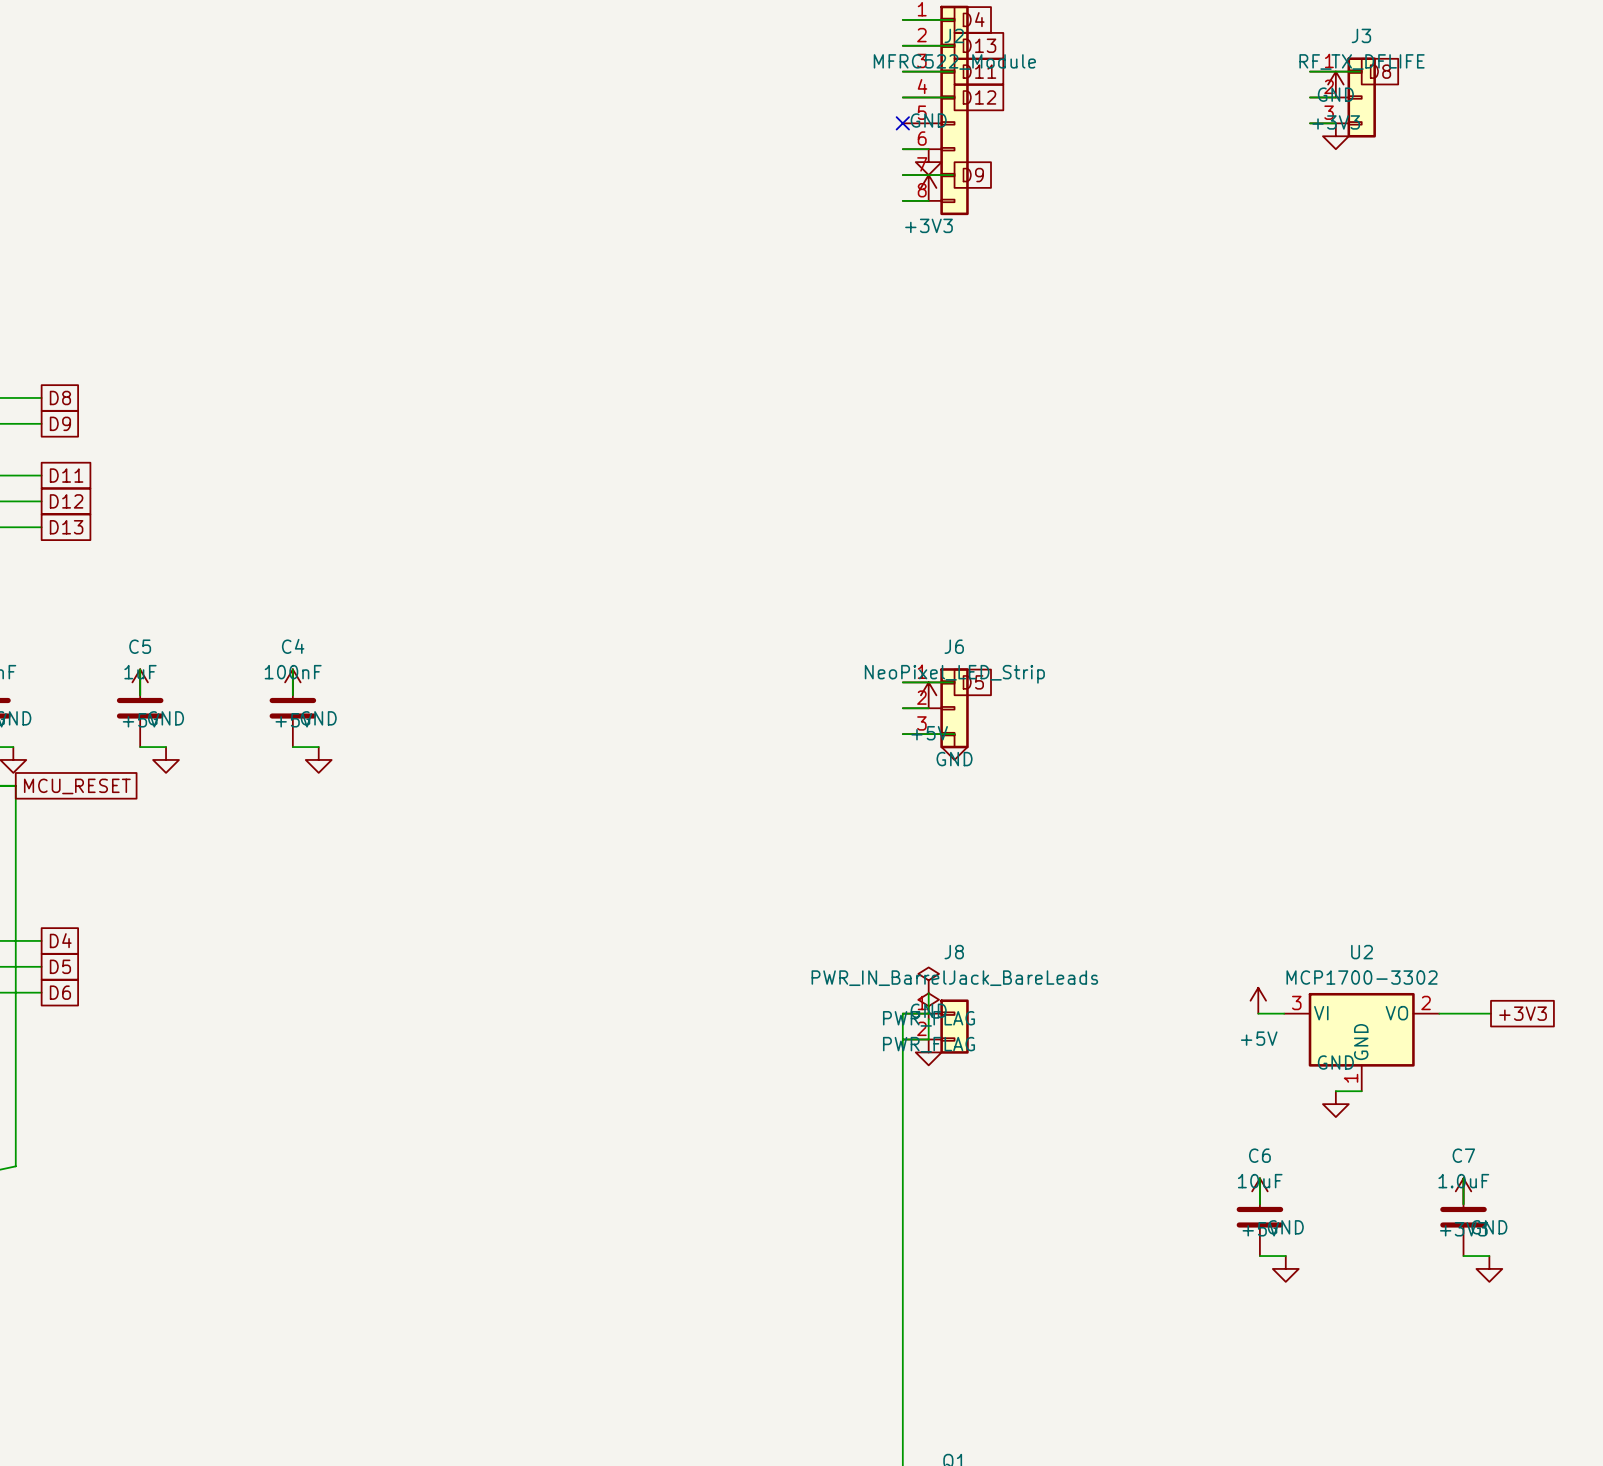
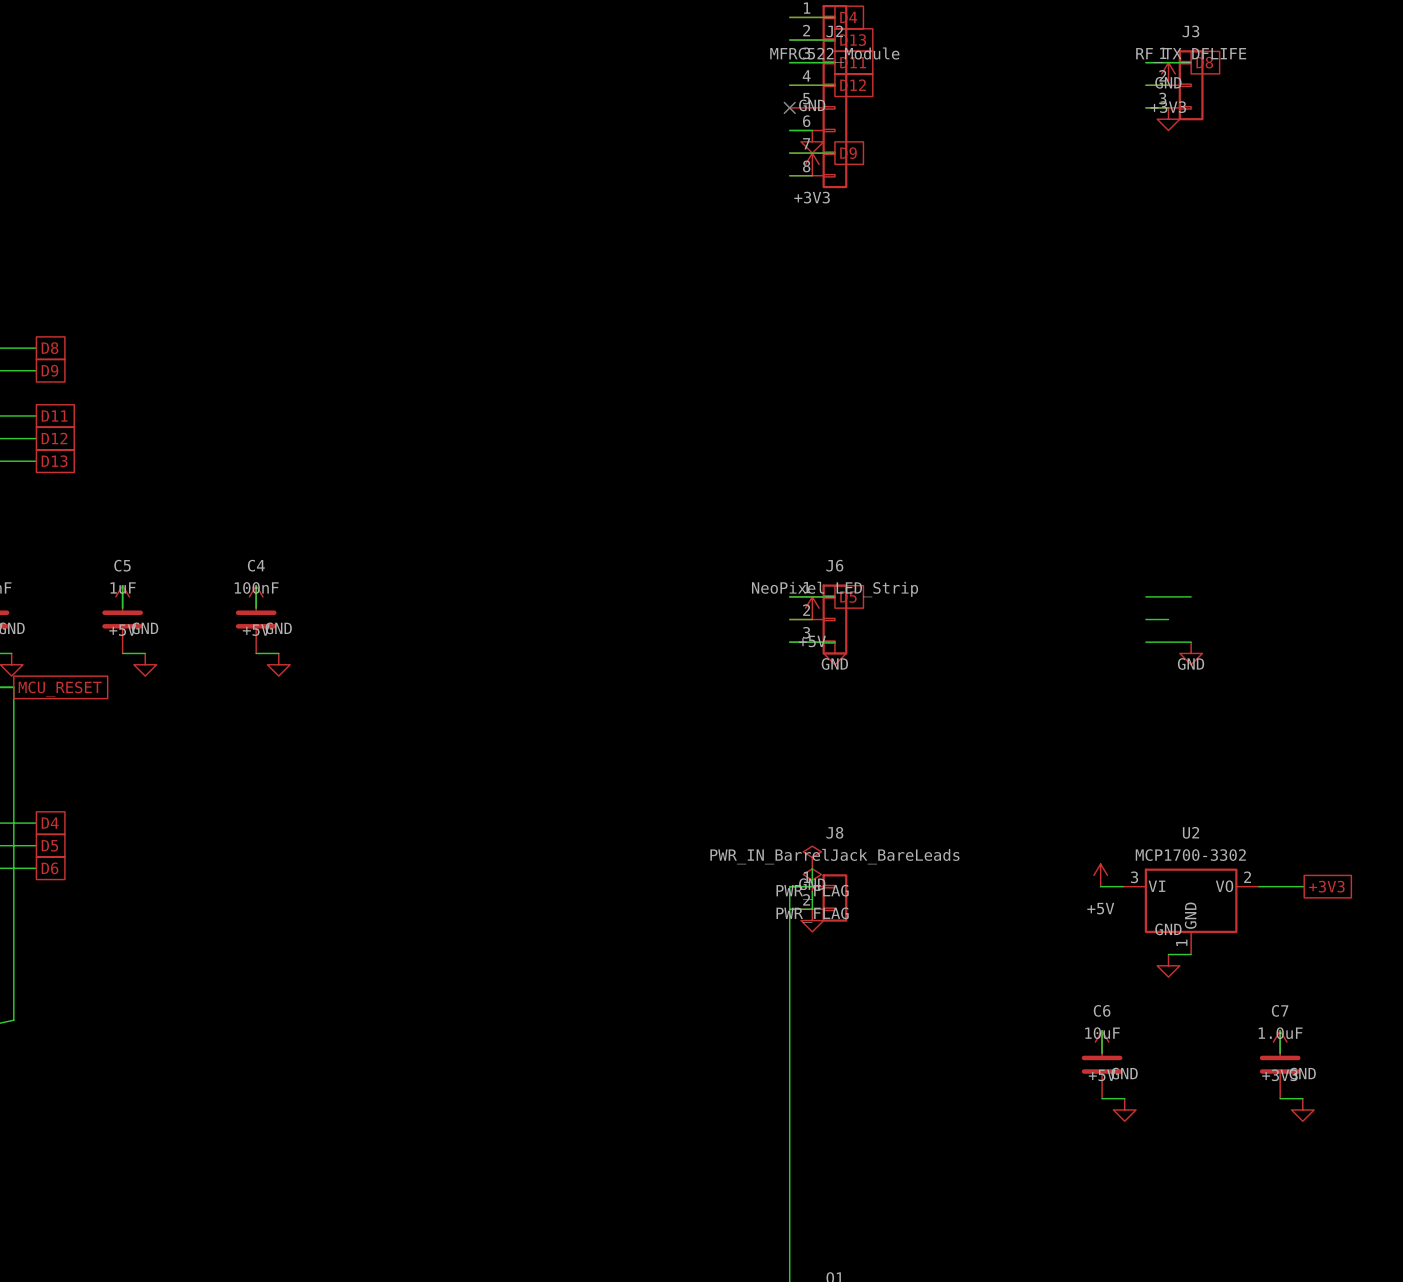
wire: none -> (1145, 596) (1191, 596)
wire: none -> (1145, 619) (1168, 619)
wire: none -> (1145, 642) (1191, 642)
power symbol: none -> GND (1191, 653)

